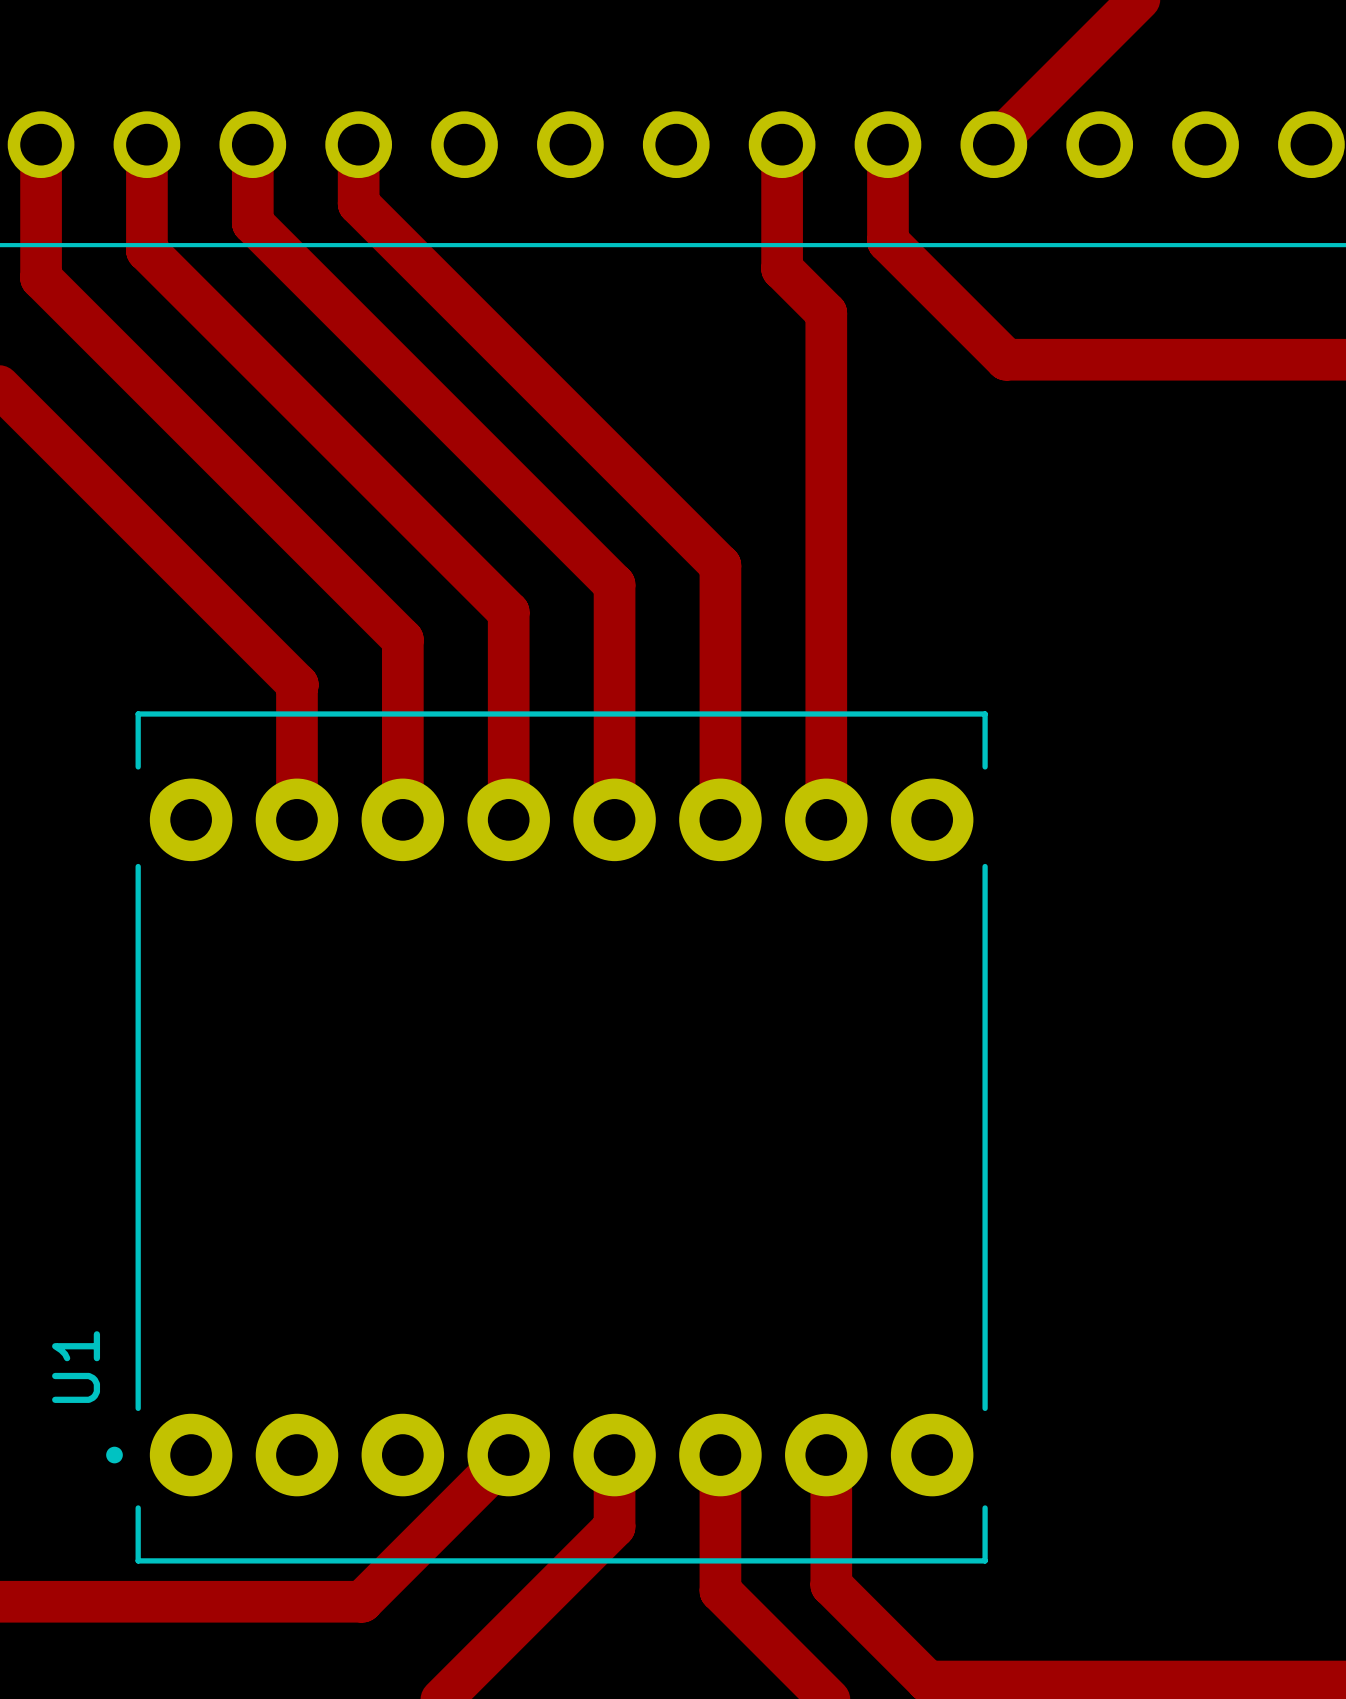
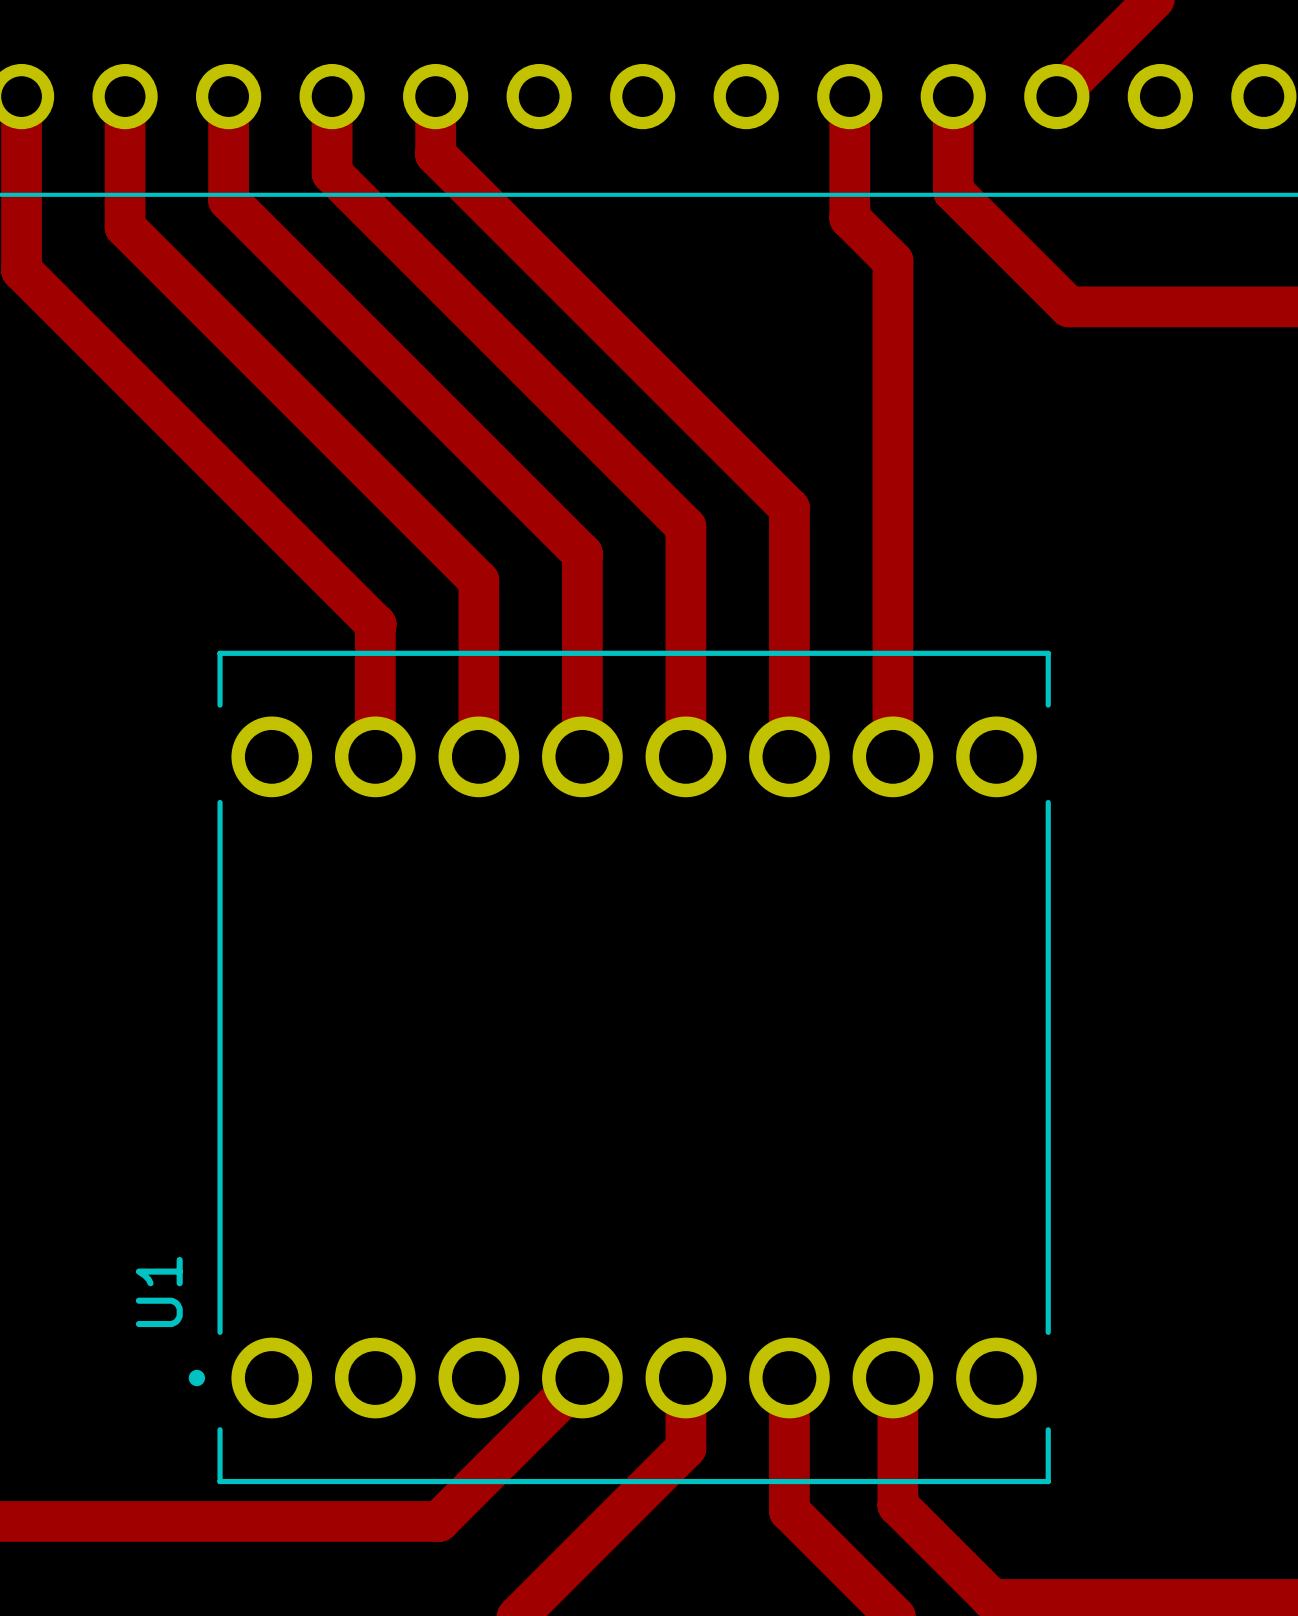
U1 footprint: [106, 711, 988, 1564] -> [188, 650, 1051, 1485]

